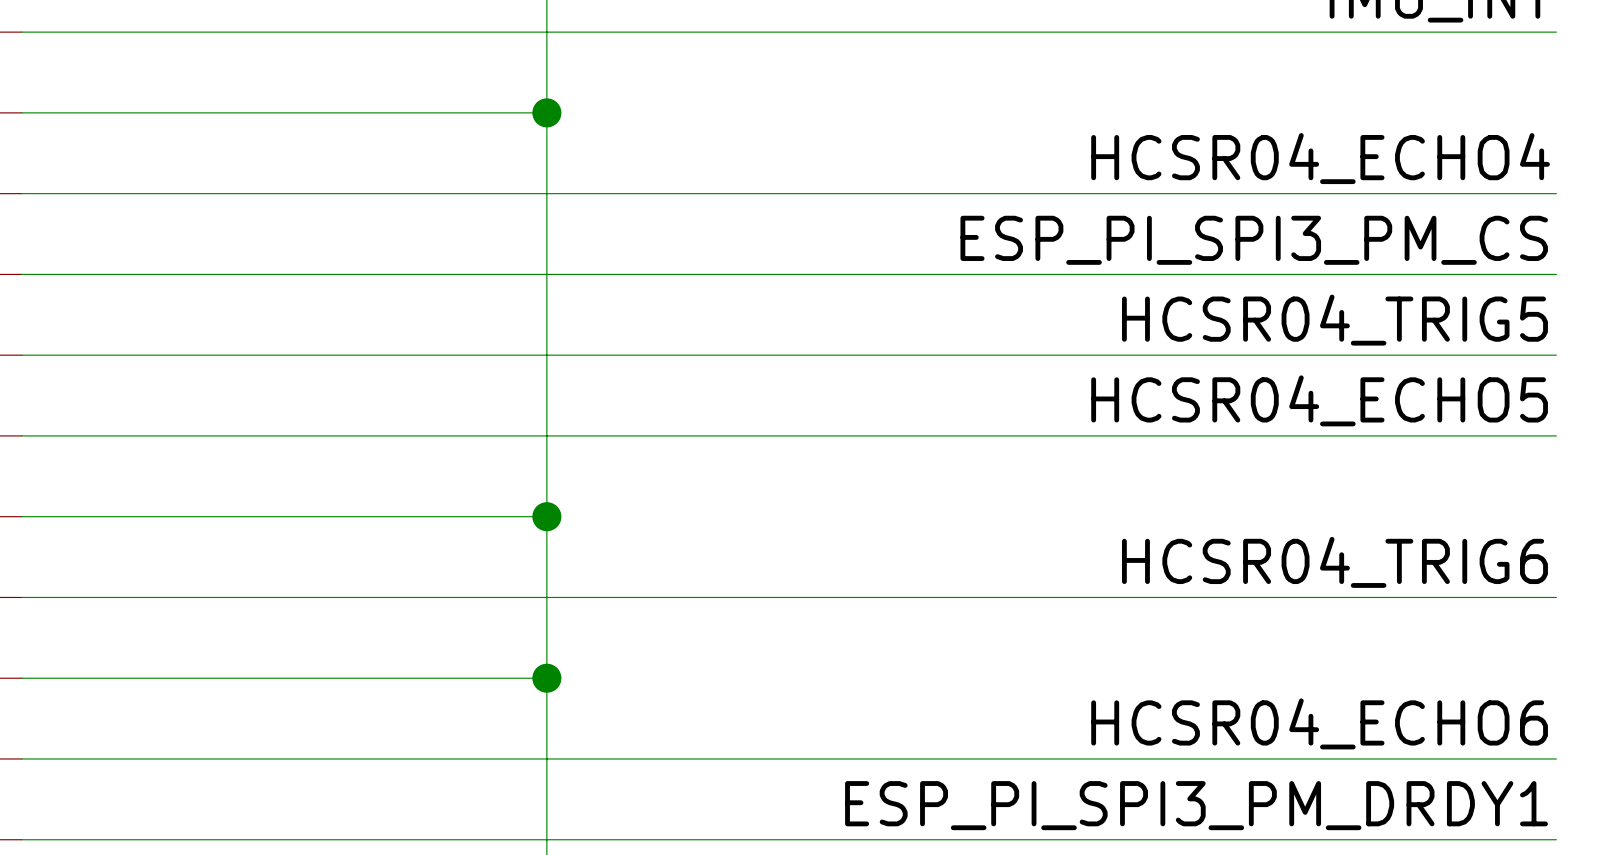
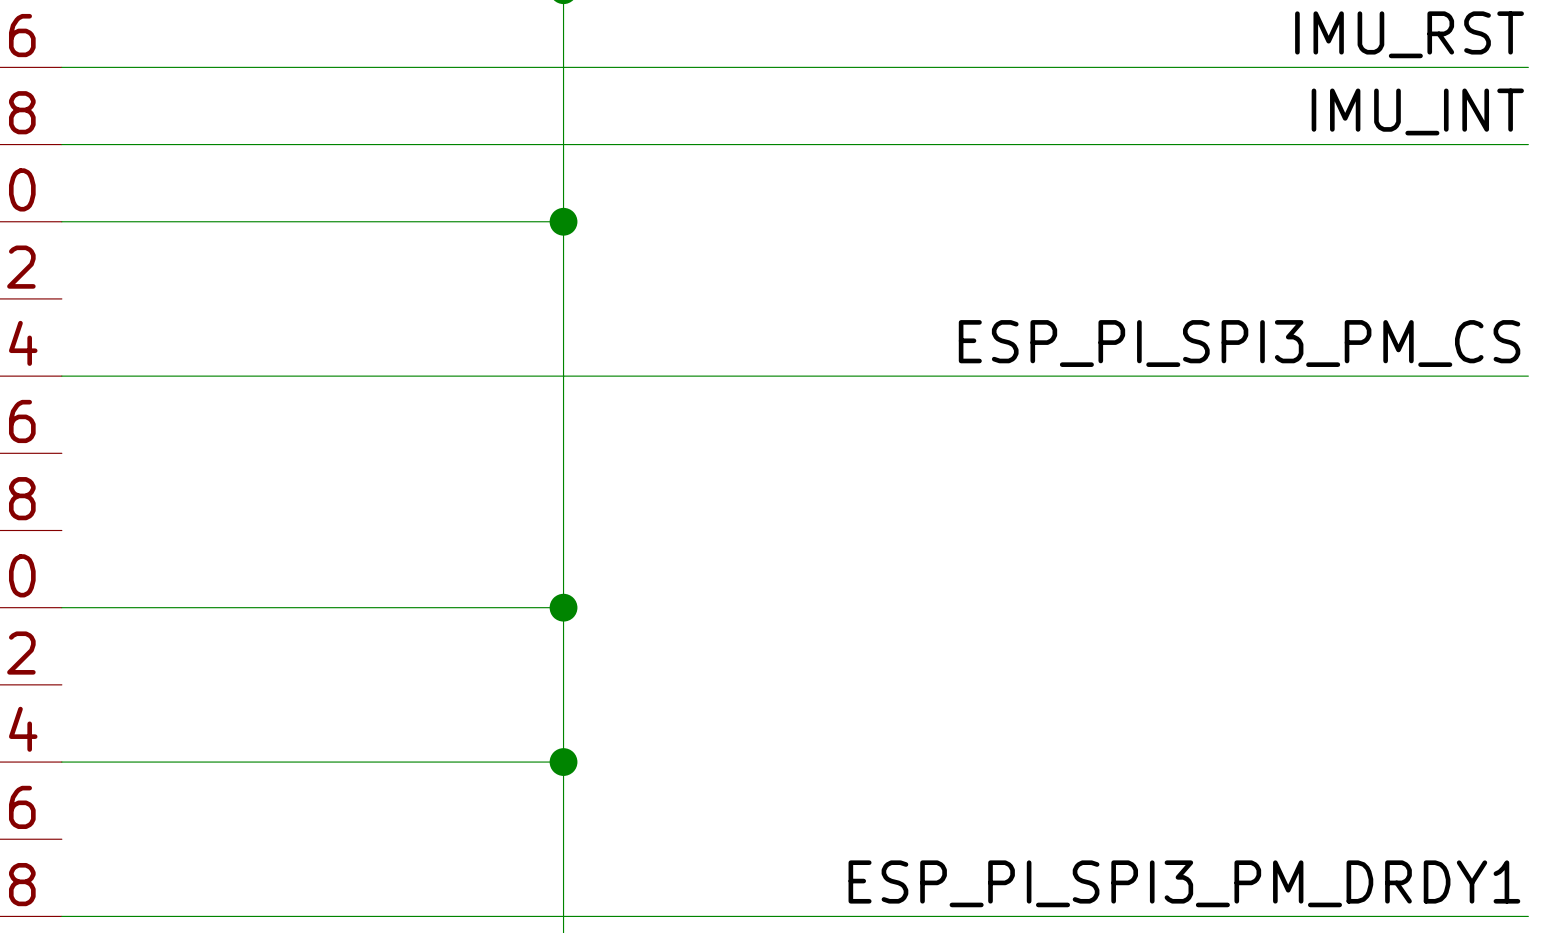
label: HCSR04_ECHO4 (1320, 158) -> none
wire: (21, 193) (1556, 193) -> none
label: HCSR04_TRIG5 (1334, 320) -> none
wire: (21, 355) (1556, 355) -> none
label: HCSR04_ECHO5 (1319, 400) -> none
wire: (21, 435) (1556, 435) -> none
label: HCSR04_TRIG6 (1334, 562) -> none
wire: (21, 597) (1556, 597) -> none
label: HCSR04_ECHO6 (1319, 723) -> none
wire: (21, 758) (1556, 758) -> none

